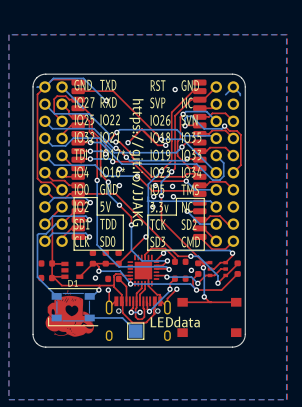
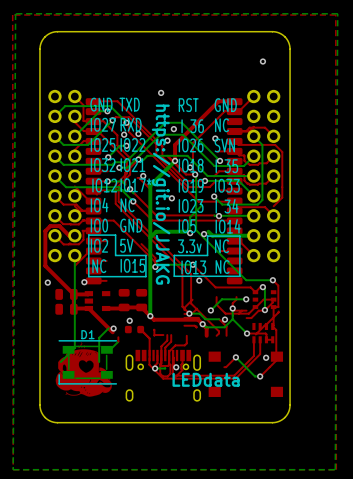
via: none -> (262, 61)
board edge: (232, 74) (45, 74) (35, 79) (33, 86) (33, 334) (38, 344) (45, 347) (232, 347) (242, 341) (245, 334) (245, 86) (241, 77) (232, 74) -> (272, 31) (284, 36) (290, 48) (290, 405) (287, 414) (281, 420) (273, 422) (57, 422) (48, 420) (42, 414) (39, 405) (39, 49) (42, 40) (48, 34) (56, 31) (272, 31)
via: none -> (161, 92)
top track: none -> (74, 96) (83, 105) (83, 121) (103, 121) (117, 135) (117, 145) (130, 158) (130, 174) (118, 185) (118, 201) (191, 274) (191, 303) (218, 331) (216, 335)
top track: none -> (253, 96) (239, 111) (224, 111) (193, 143) (193, 169) (196, 172)
top track: (78, 82) (75, 79) (52, 79) (37, 94) (37, 178) (41, 182) (51, 182) (58, 189) (62, 189) -> none
top track: none -> (93, 101) (117, 101) (162, 146) (162, 157) (186, 180) (204, 180)
top track: none -> (234, 101) (218, 101) (175, 144) (175, 160)
bottom track: (37, 87) (44, 87) (53, 78) (83, 78) (106, 100) -> none
bottom track: (62, 87) (83, 108) -> none
top track: (216, 87) (203, 99) (191, 99) (175, 115) (175, 168) (171, 171) -> none
via: (175, 89) -> none
bottom track: none -> (107, 111) (99, 111) (74, 136)
via: none -> (107, 111)
top track: (78, 91) (113, 91) (161, 139) -> none
top track: (199, 91) (193, 91) (171, 112) (171, 160) (161, 171) -> none
bottom track: (225, 94) (233, 87) (240, 95) -> none
bottom track: none -> (54, 116) (65, 106) (110, 106) (128, 124)
top track: none -> (74, 116) (74, 122) (83, 131) (97, 131) (126, 160) (126, 173) (115, 184) (115, 203) (182, 270) (182, 306) (189, 313)
bottom track: none -> (112, 120) (88, 144) (63, 144) (54, 136)
top track: none -> (112, 120) (115, 117) (129, 117) (156, 144) (156, 155) (188, 187) (209, 187) (216, 180) (234, 180)
via: none -> (112, 120)
top track: (78, 99) (69, 99) (65, 96) (57, 96) (54, 99) (54, 113) (62, 121) -> none
top track: none -> (128, 124) (128, 131) (198, 201) (234, 200)
text: SVP (157, 102) -> I 36 (192, 126)
bottom track: (44, 104) (54, 113) (88, 113) (109, 134) (109, 139) (112, 142) (115, 142) -> none
top track: (62, 104) (71, 116) (84, 116) (89, 121) (89, 131) (97, 139) (97, 180) -> none
via: none -> (173, 129)
top track: none -> (234, 131) (246, 131) (249, 127) (265, 127) (273, 136)
top track: (78, 108) (84, 108) (92, 116) (92, 130) (100, 139) (100, 174) (108, 182) -> none
via: none -> (138, 133)
via: none -> (124, 134)
bottom track: (183, 114) (185, 111) (206, 111) (216, 121) -> none
top track: (183, 114) (180, 117) (180, 138) (177, 141) (177, 155) (189, 168) (199, 168) -> none
top track: none -> (93, 141) (83, 141) (74, 149) (74, 156)
via: none -> (167, 140)
top track: (199, 116) (208, 116) (212, 113) (225, 113) (233, 121) -> none
bottom track: none -> (126, 145) (119, 145) (108, 157)
via: none -> (126, 145)
bottom track: (44, 121) (52, 128) (93, 128) (113, 148) (116, 148) -> none
top track: (78, 125) (71, 125) (62, 134) (62, 138) -> none
bottom track: (185, 125) (185, 118) (191, 116) (204, 128) (221, 128) (224, 126) -> none
via: (185, 125) -> none
top track: none -> (234, 150) (239, 155) (244, 155) (244, 160) (249, 164) (266, 163) (273, 156)
top track: (224, 126) (229, 130) (236, 130) (240, 134) -> (234, 141) (238, 144) (275, 144) (282, 152) (282, 162)
via: (224, 126) -> none
bottom track: none -> (54, 156) (63, 164) (112, 164) (114, 162) (125, 162) (165, 122) (181, 122) (219, 160)
top track: (141, 129) (128, 142) -> none
bottom track: none -> (253, 156) (243, 166) (214, 166) (183, 134) (160, 134) (127, 167) (119, 167)
via: none -> (108, 157)
bottom track: (116, 132) (119, 129) (176, 129) (183, 135) (213, 135) (216, 138) -> none
bottom track: none -> (143, 160) (147, 155) (187, 155) (207, 176) (253, 176)
bottom track: none -> (175, 160) (150, 185) (150, 316)
via: none -> (175, 160)
via: none -> (219, 160)
top track: (199, 133) (208, 133) (212, 130) (225, 130) (233, 138) -> none
text: IO35 (191, 137) -> I 35 (226, 166)
bottom track: (44, 138) (52, 145) (65, 145) (73, 138) (99, 138) (114, 152) (176, 152) (181, 146) -> none
via: none -> (119, 167)
bottom track: (161, 139) (182, 139) (216, 172) -> none
bottom track: (90, 142) (100, 142) (121, 164) (196, 164) (212, 180) (219, 180) (223, 176) (223, 167) -> (214, 196) (222, 204) (257, 204) (262, 200)
via: (90, 142) -> none
top track: (115, 142) (119, 142) (151, 176) (184, 176) (187, 173) (196, 173) (199, 176) -> none
via: (115, 142) -> none
via: (128, 142) -> none
top track: none -> (234, 170) (239, 175) (244, 175) (244, 180) (249, 184) (266, 183) (273, 176)
bottom track: none -> (196, 172) (196, 230) (246, 280) (272, 280)
bottom track: none -> (54, 176) (66, 187) (119, 187) (133, 201)
part: none -> (64, 176)
via: none -> (143, 176)
via: (181, 146) -> none
part: none -> (263, 176)
via: (116, 148) -> none
bottom track: none -> (204, 180) (238, 180) (253, 195)
via: none -> (204, 180)
top track: (199, 151) (206, 151) (210, 147) (225, 147) (233, 155) -> none
text: TDI (80, 154) -> IO12 (104, 185)
via: (105, 154) -> none
bottom track: (44, 155) (54, 165) (95, 165) (106, 176) (137, 176) -> none
bottom track: (216, 155) (223, 162) -> (253, 136) (262, 144) (262, 195)
top track: none -> (130, 189) (156, 215) (214, 215)
via: none -> (130, 189)
bottom track: (126, 157) (129, 160) (185, 160) (187, 158) -> none
via: (126, 157) -> none
via: (90, 158) -> none
via: (187, 158) -> none
top track: (112, 161) (132, 161) (151, 181) (186, 181) -> none
via: (112, 161) -> none
top track: none -> (54, 195) (63, 204) (76, 204) (82, 210) (93, 210)
part: (53, 164) -> none
via: none -> (214, 196)
part: (224, 164) -> none
via: none -> (171, 198)
top track: none -> (133, 201) (152, 220) (234, 220)
via: none -> (133, 201)
via: (119, 169) -> none
bottom track: (161, 171) (148, 184) (148, 234) (146, 236) -> none
via: (161, 171) -> none
via: (171, 171) -> none
top track: (44, 172) (52, 180) (64, 180) (69, 185) (78, 185) -> none
text: IO16* (112, 172) -> NC (127, 205)
text: IO34 (191, 172) -> I 34 (227, 206)
top track: (137, 176) (152, 190) (196, 190) (199, 193) -> none
via: (137, 176) -> none
top track: none -> (234, 210) (238, 207) (265, 207) (273, 215)
top track: none -> (54, 215) (63, 224) (78, 224) (83, 219) (113, 220) (156, 263)
bottom track: (97, 180) (97, 244) (118, 266) (166, 266) (169, 269) -> none
via: (97, 180) -> none
bottom track: none -> (214, 215) (253, 215)
bottom track: (186, 181) (194, 189) (216, 189) -> none
bottom track: (108, 182) (108, 194) (119, 205) -> none
via: (108, 182) -> none
via: (119, 185) -> none
via: (155, 185) -> none
top track: (199, 185) (206, 185) (210, 181) (225, 181) (233, 189) -> none
via: (172, 186) -> none
top track: (44, 189) (52, 197) (65, 197) (69, 193) (115, 193) (178, 256) (190, 256) -> none
text: TMS (190, 189) -> IO14 (228, 226)
top track: none -> (93, 230) (82, 230) (83, 239) (78, 244) (63, 244) (54, 235)
bottom track: none -> (187, 231) (156, 231) (150, 237)
bottom track: none -> (208, 231) (212, 235) (253, 235)
top track: (161, 195) (161, 220) (203, 262) (203, 267) -> none
via: (153, 196) -> none
top track: none -> (74, 235) (69, 235) (59, 226) (50, 226) (45, 231) (45, 265) (73, 294)
bottom track: (147, 201) (210, 201) (216, 206) -> none
bottom track: (90, 202) (85, 197) (54, 197) (44, 206) -> none
via: (90, 202) -> none
via: (119, 205) -> none
top track: (62, 206) (52, 216) (52, 263) -> none
via: (152, 206) -> none
bottom track: (187, 211) (199, 224) (216, 224) -> none
via: (187, 211) -> none
bottom track: none -> (74, 255) (74, 347) (60, 361)
bottom track: (89, 219) (85, 216) (52, 216) (44, 224) -> none
via: (89, 219) -> none
top track: (199, 219) (206, 219) (210, 216) (220, 216) (227, 224) (233, 224) -> none
bottom track: none -> (156, 263) (192, 264)
top track: none -> (192, 264) (215, 287) (250, 287) (255, 292) (262, 287)
via: none -> (192, 264)
bottom track: (62, 224) (55, 224) (46, 233) (37, 234) (37, 277) (56, 296) -> none
text: SD1 (81, 224) -> NC (99, 266)
text: TDD (108, 224) -> IO15 (132, 265)
bottom track: (131, 224) (131, 250) (142, 260) (167, 260) -> none
text: TCK (158, 224) -> IO13 (193, 267)
text: SD2 (188, 224) -> NC (222, 266)
top track: (78, 228) (71, 228) (62, 237) (62, 241) -> none
top track: (199, 228) (203, 228) (216, 241) -> (234, 240) (238, 240) (253, 255)
line: (147, 232) (147, 250) (203, 250) -> (174, 276) (239, 276)
line: (204, 232) (204, 250) -> none
line: (123, 233) (123, 250) (74, 250) (74, 233) -> (145, 276) (88, 276)
bottom track: (89, 236) (85, 233) (52, 233) (44, 241) -> none
via: (89, 236) -> none
top track: (146, 236) (118, 263) (92, 263) (79, 276) -> none
via: (146, 236) -> none
via: none -> (199, 280)
top track: (199, 236) (211, 249) (225, 249) (233, 241) -> none
top track: none -> (272, 280) (278, 285) (278, 307)
via: none -> (272, 280)
via: none -> (47, 282)
via: none -> (84, 282)
text: CLK (81, 241) -> none
text: SD0 (107, 241) -> none
text: SD3 (157, 241) -> none
text: CMD (190, 241) -> none
bottom track: none -> (262, 287) (264, 289) (264, 310)
via: none -> (262, 287)
top track: none -> (88, 293) (73, 294)
part: none -> (66, 294)
top track: none -> (73, 294) (73, 309) (88, 308) (112, 332) (108, 328)
part footprint: [102, 250, 109, 267] -> [118, 288, 130, 312]
part footprint: [115, 250, 122, 267] -> [136, 288, 148, 312]
top track: none -> (216, 297) (216, 304) (225, 313) (248, 313) (263, 299) (273, 299)
top track: none -> (236, 297) (232, 303) (232, 308)
bottom track: none -> (246, 299) (221, 299) (210, 310)
via: none -> (246, 299)
via: (163, 253) -> none
bottom track: (232, 253) (229, 250) (166, 250) (163, 253) -> none
via: (232, 253) -> none
bottom track: (190, 256) (198, 256) (217, 275) (217, 283) -> none
via: (190, 256) -> none
top track: (145, 257) (145, 254) (151, 248) (165, 248) (174, 258) (174, 261) -> none
part: (92, 258) -> none
top track: none -> (278, 307) (273, 307) (272, 326) (276, 330) (276, 360) (260, 376)
top track: none -> (106, 308) (141, 307) (153, 319) (198, 319) (206, 328) (206, 335)
via: (167, 260) -> none
bottom track: none -> (232, 308) (232, 319)
via: none -> (232, 308)
part: none -> (66, 309)
part: (180, 261) -> none
via: none -> (210, 310)
via: none -> (264, 310)
part: (46, 263) -> none
top track: (52, 263) (64, 263) -> none
top track: (52, 263) (52, 277) -> none
top track: (95, 263) (98, 266) (98, 271) -> none
bottom track: none -> (189, 313) (199, 313) (205, 319) (219, 319)
via: none -> (189, 313)
via: none -> (150, 316)
bottom track: (203, 267) (204, 296) -> none
via: (203, 267) -> none
part: (198, 268) -> none
part: (237, 268) -> none
via: (169, 269) -> none
part position: (217, 269) -> (264, 299)
top track: (225, 269) (220, 269) (214, 275) (205, 275) (197, 283) -> none
part position: (72, 270) -> (97, 301)
top track: (143, 270) (148, 275) (148, 286) (157, 294) (160, 294) (160, 301) (167, 307) (167, 298) (176, 289) -> none
part: (143, 270) -> none
top track: none -> (219, 319) (226, 326) (226, 335)
bottom track: none -> (232, 319) (224, 327) (205, 327) (202, 324)
bottom track: none -> (232, 319) (247, 333)
bottom track: (98, 271) (120, 271) (130, 284) (190, 284) (196, 290) -> none
via: (98, 271) -> none
via: none -> (129, 320)
top track: (198, 273) (193, 279) (193, 286) (196, 290) -> none
top track: (237, 273) (221, 290) (196, 290) -> none
via: none -> (202, 324)
top track: (130, 275) (115, 274) (114, 275) (114, 287) (121, 294) (122, 312) (132, 322) (146, 321) -> none
top track: (64, 276) (51, 278) (61, 285) (114, 285) -> none
bottom track: none -> (108, 328) (99, 337) (99, 361)
bottom track: (166, 277) (191, 277) (197, 283) -> none
via: (166, 277) -> none
part: (46, 278) -> none
top track: (174, 278) (170, 283) (170, 289) -> none
part: (180, 278) -> none
part: none -> (263, 333)
top track: none -> (247, 333) (265, 333) (266, 339) (272, 339)
via: none -> (247, 333)
via: (197, 283) -> none
via: (217, 283) -> none
via: (130, 284) -> none
top track: none -> (186, 335) (186, 343) (184, 345) (175, 345) (168, 351) (167, 365) (161, 365) (161, 358)
top track: none -> (253, 339) (253, 355) (234, 375) (174, 375) (172, 373) (172, 358)
top track: none -> (260, 339) (260, 354) (235, 378) (163, 378) (149, 364) (149, 358)
bottom track: (170, 289) (149, 311) -> none
via: (170, 289) -> none
via: (176, 289) -> none
via: (98, 290) -> none
top track: (108, 290) (109, 307) (116, 301) -> none
via: (108, 290) -> none
via: (196, 290) -> none
top track: (204, 296) (209, 302) -> none
via: (204, 296) -> none
bottom track: none -> (235, 357) (254, 376) (260, 376)
top track: none -> (235, 357) (224, 367)
via: none -> (235, 357)
top track: (236, 302) (182, 302) -> none
via: none -> (266, 357)
via: (140, 312) -> none
bottom track: (89, 317) (122, 317) (135, 331) -> none
via: none -> (260, 376)
part: (135, 331) -> none
bottom zone outline: (286, 399) (286, 34) (8, 34) (8, 399) -> (335, 469) (337, 13) (15, 13) (13, 469)
top zone outline: (287, 399) (287, 34) (8, 34) (8, 399) -> (336, 469) (335, 14) (12, 14) (13, 469)

